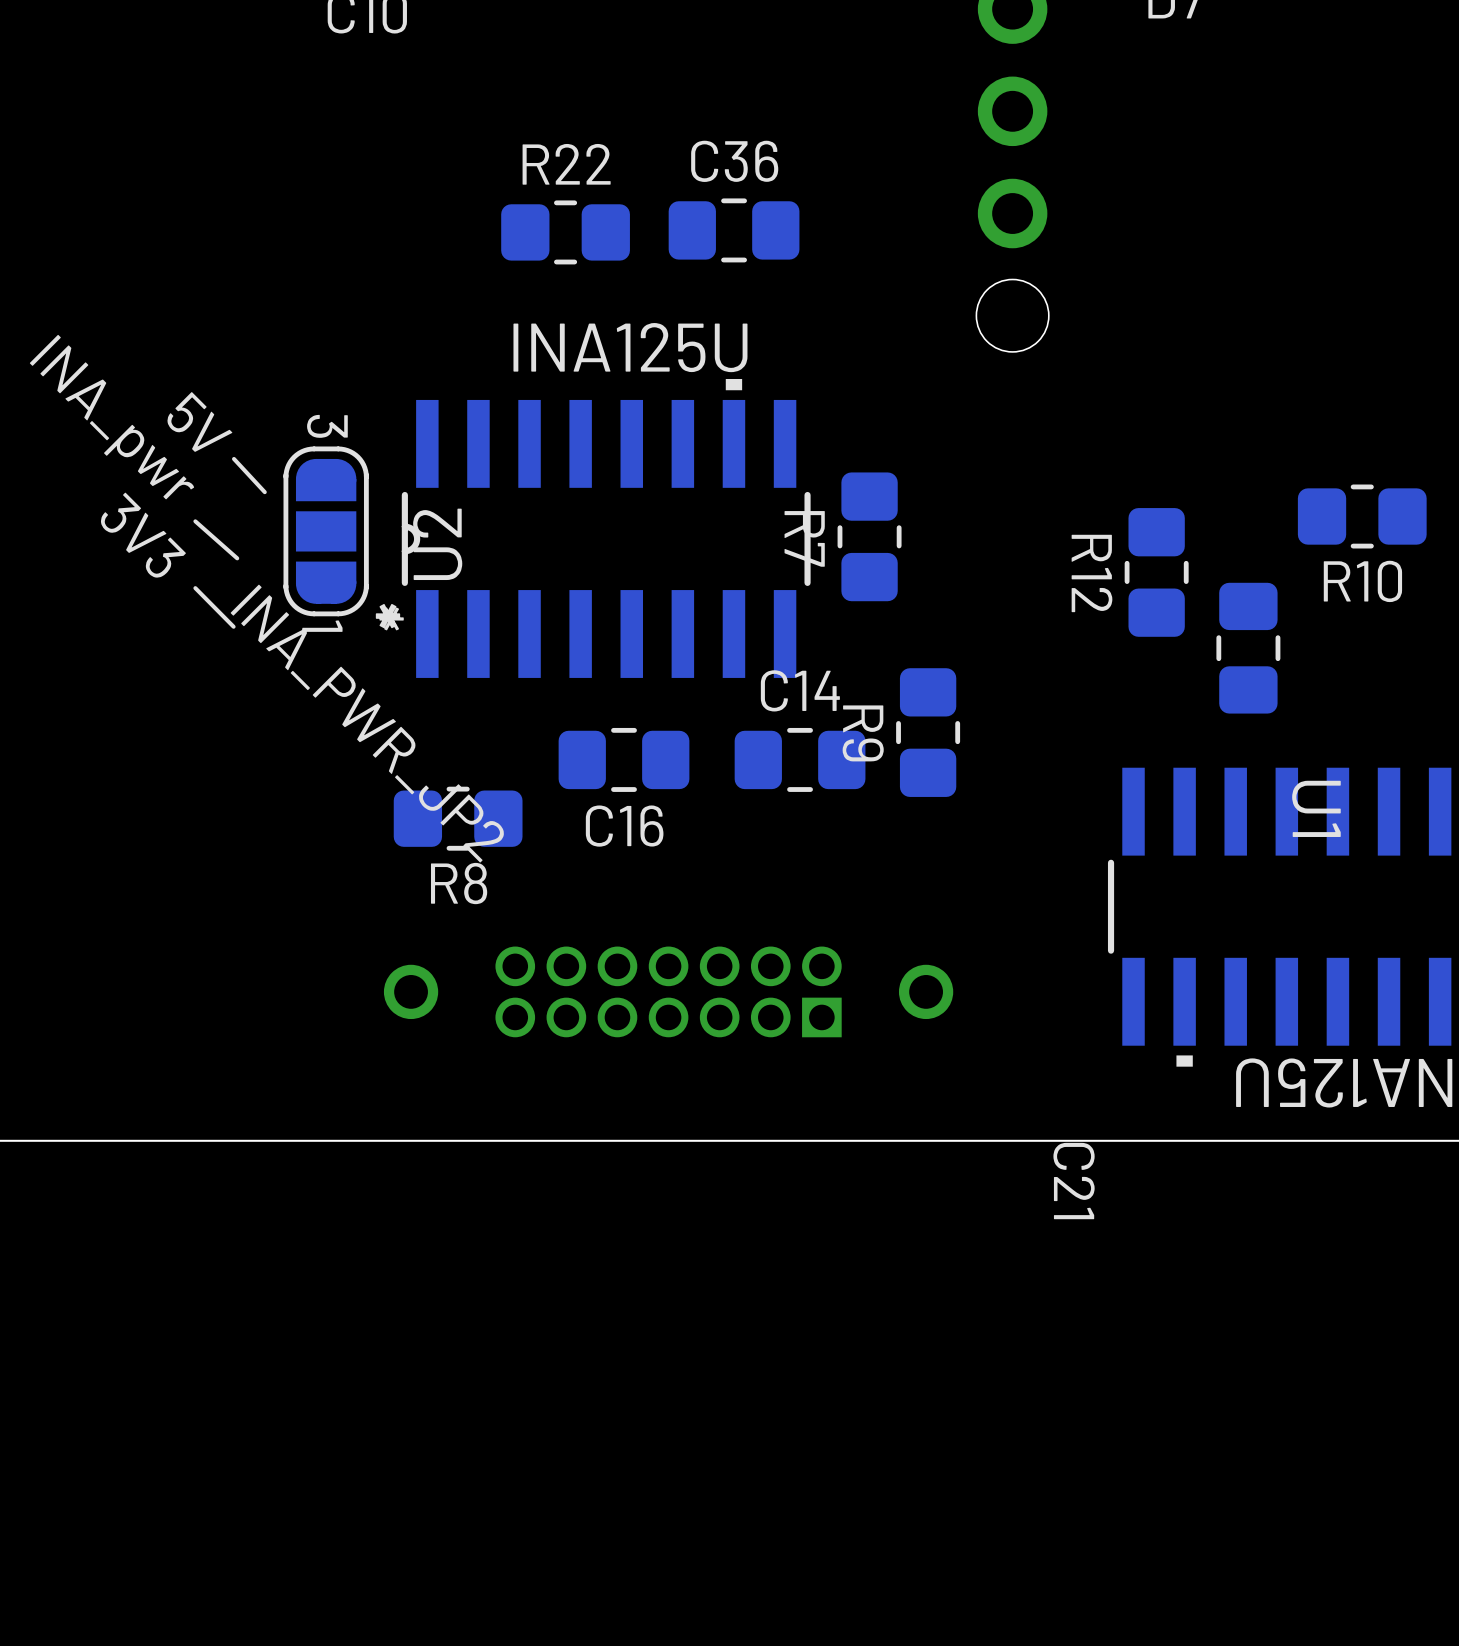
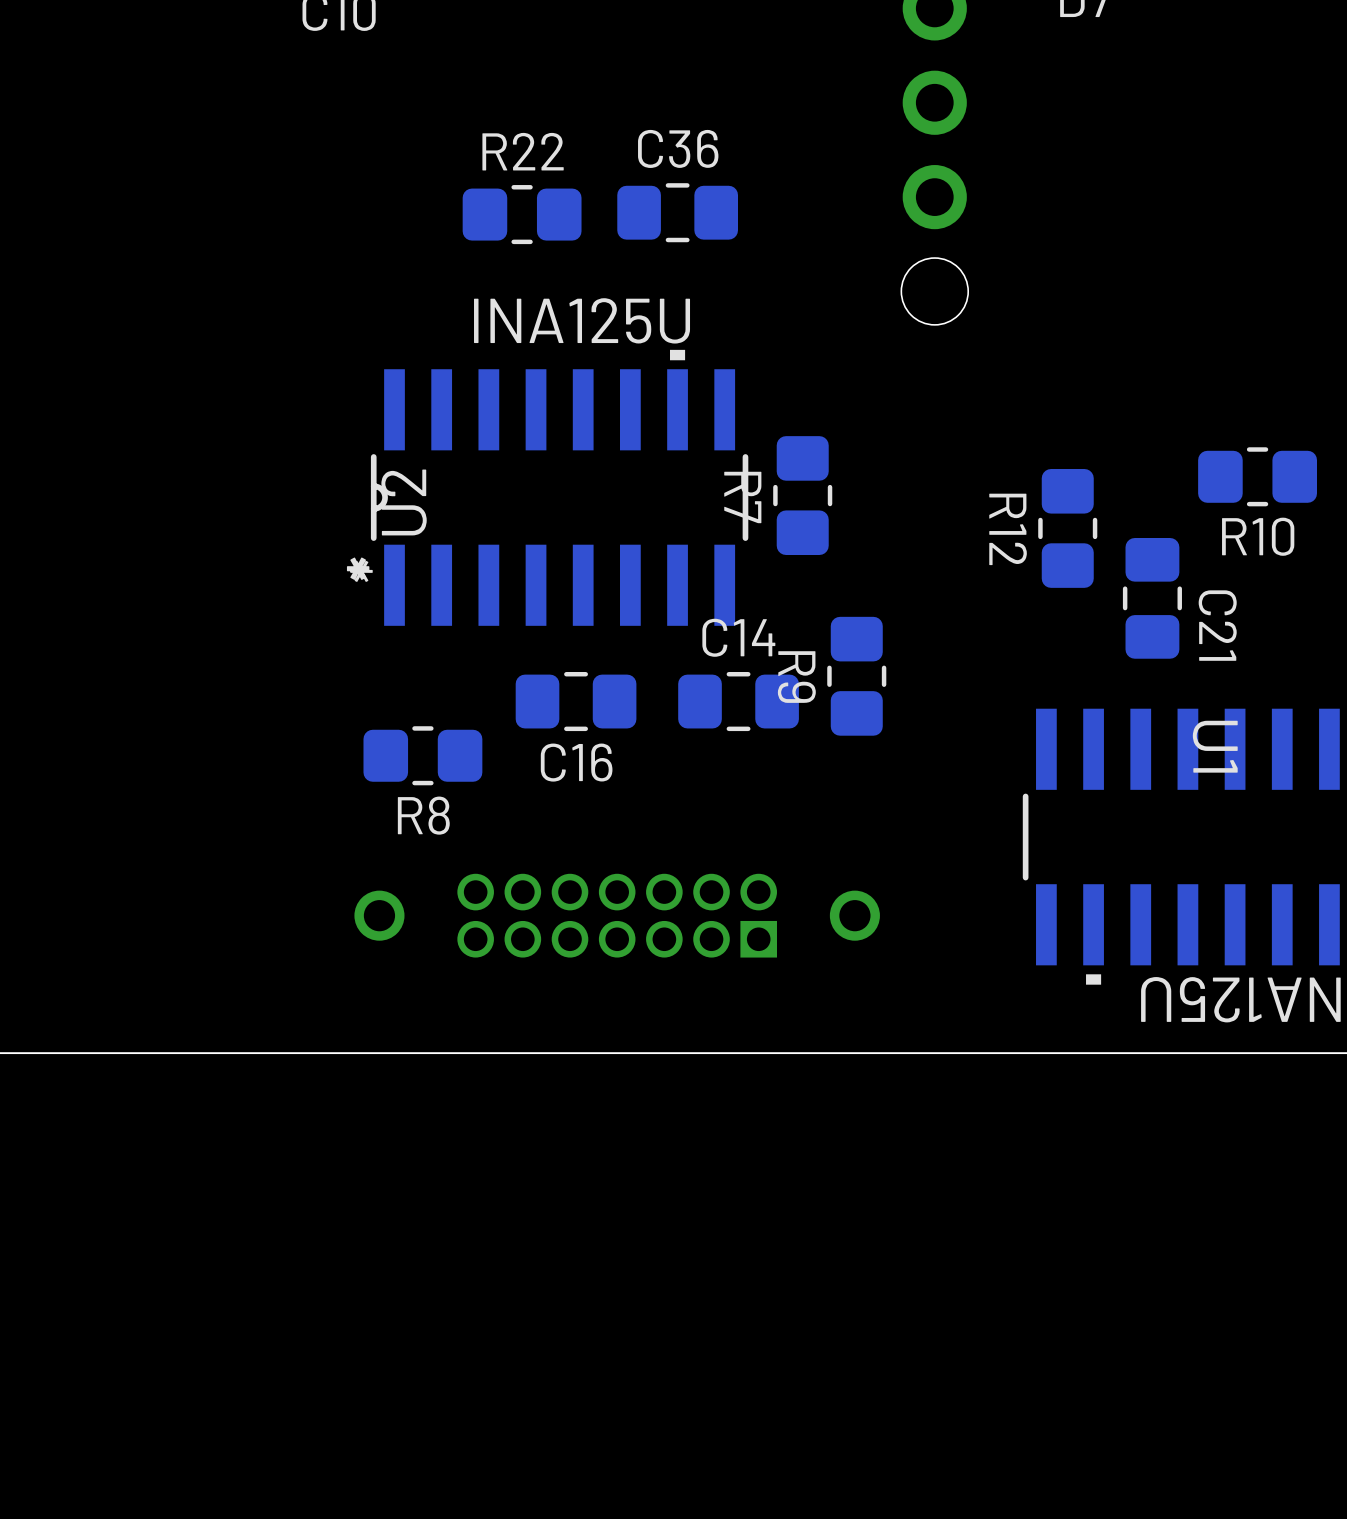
text: INA_pwr (111, 417) -> none
text: 5V (199, 421) -> none
line: (234, 458) (264, 492) -> none
line: (195, 521) (237, 558) -> none
INA_PWR_JP2: (326, 531) -> none
text: 3V3 (143, 535) -> none
line: (195, 588) (233, 626) -> none
C21 name position: C21 (1074, 1181) -> C21 (1217, 625)

